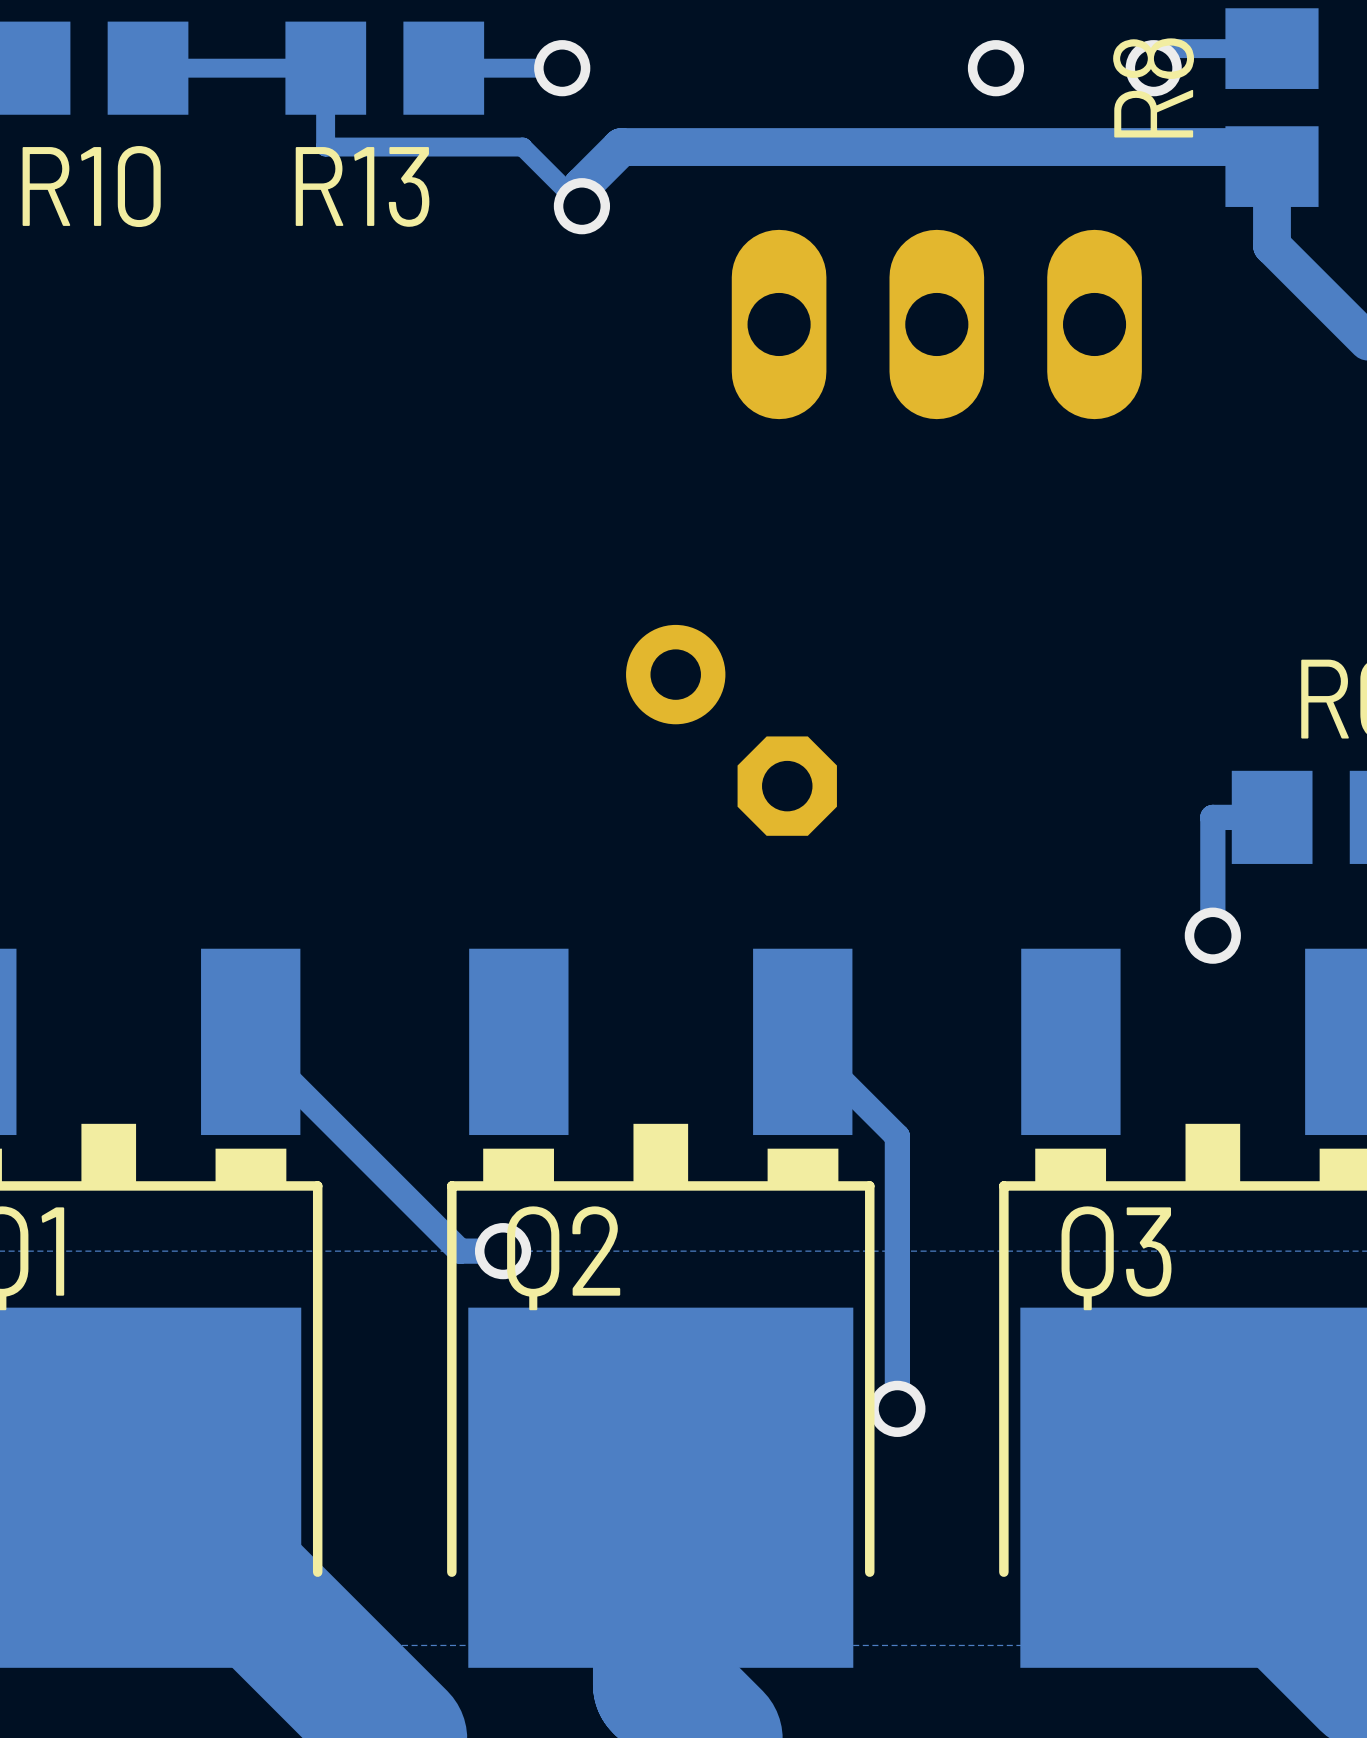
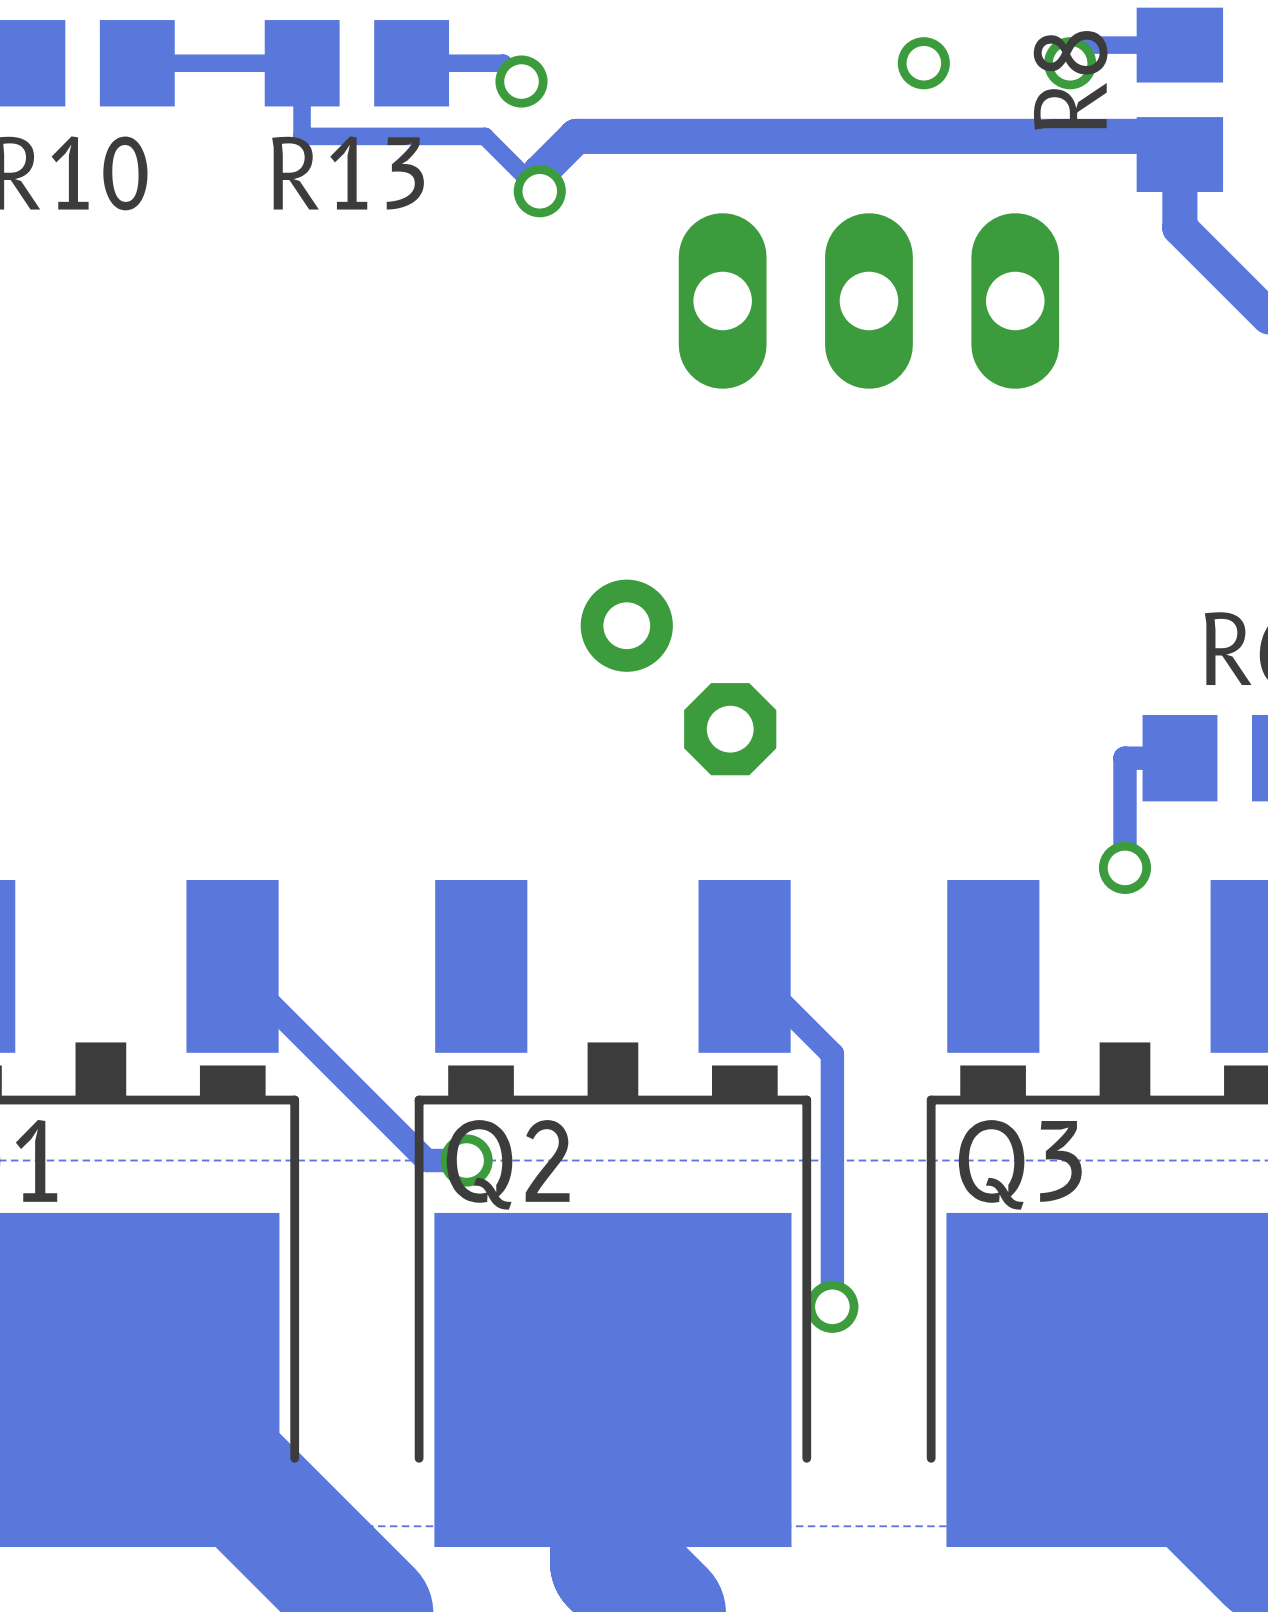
via position: (562, 68) -> (521, 81)

